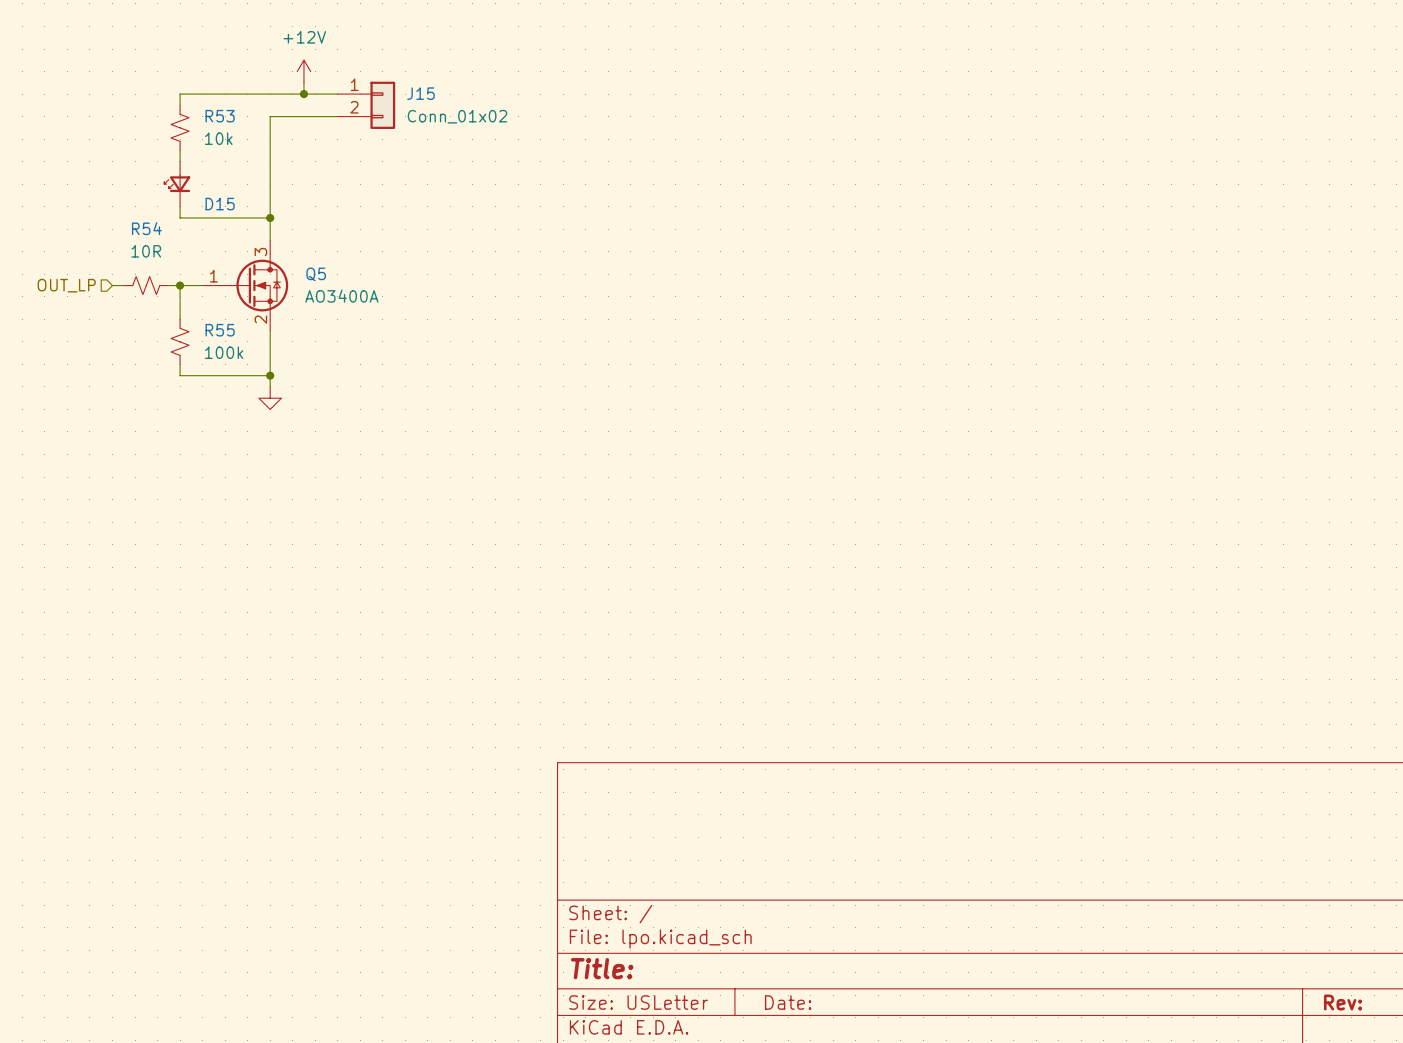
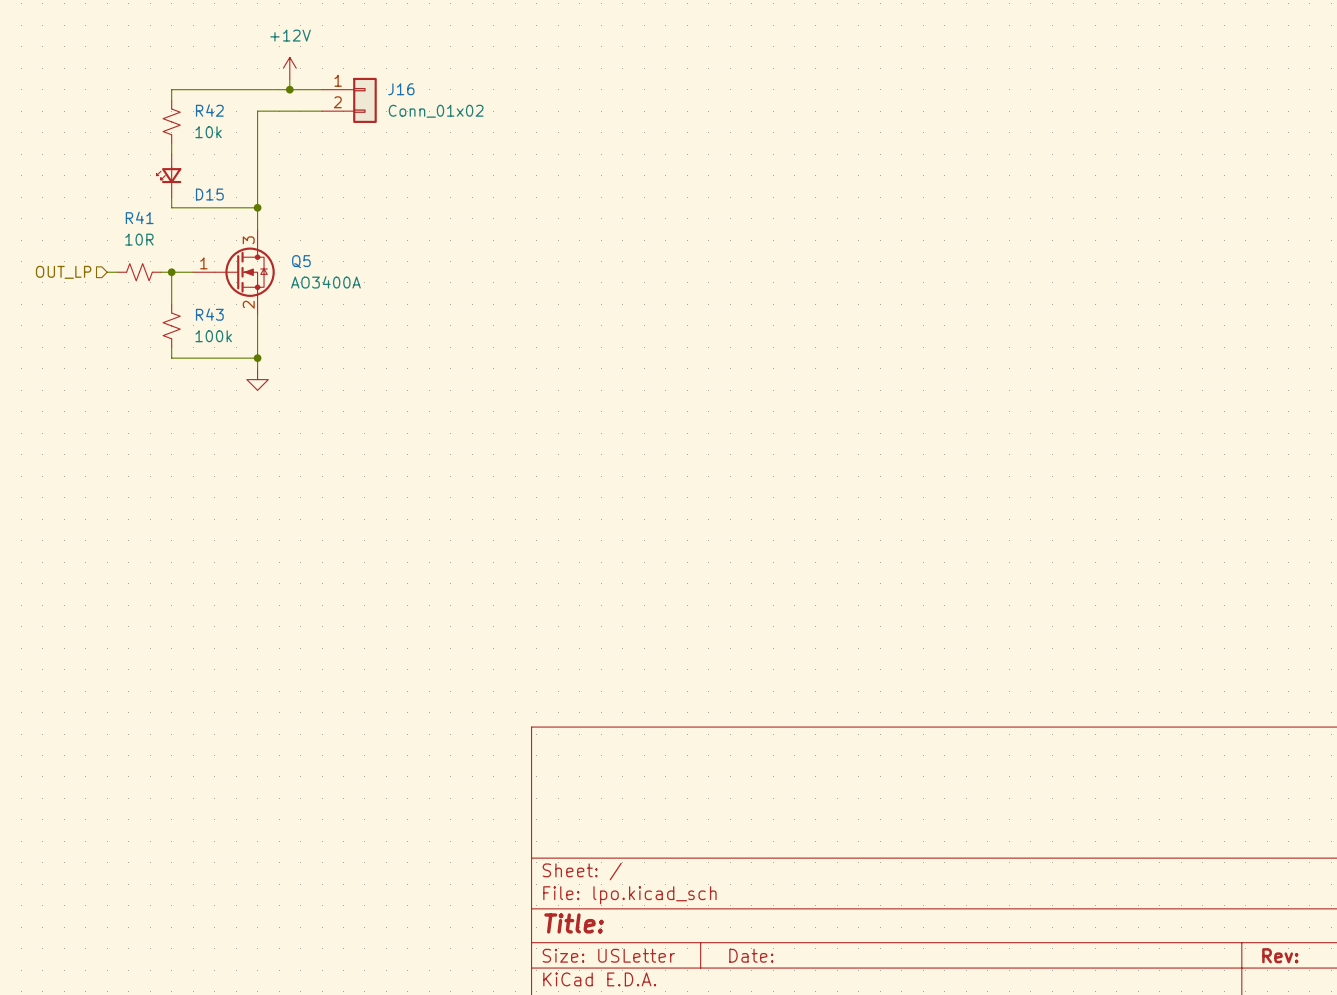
J15 name: J15 (420, 93) -> J16 (401, 89)
R53 name: R53 (220, 116) -> R42 (209, 110)
R54 name: R54 (146, 228) -> R41 (139, 217)
R55 name: R55 (220, 330) -> R43 (209, 314)

